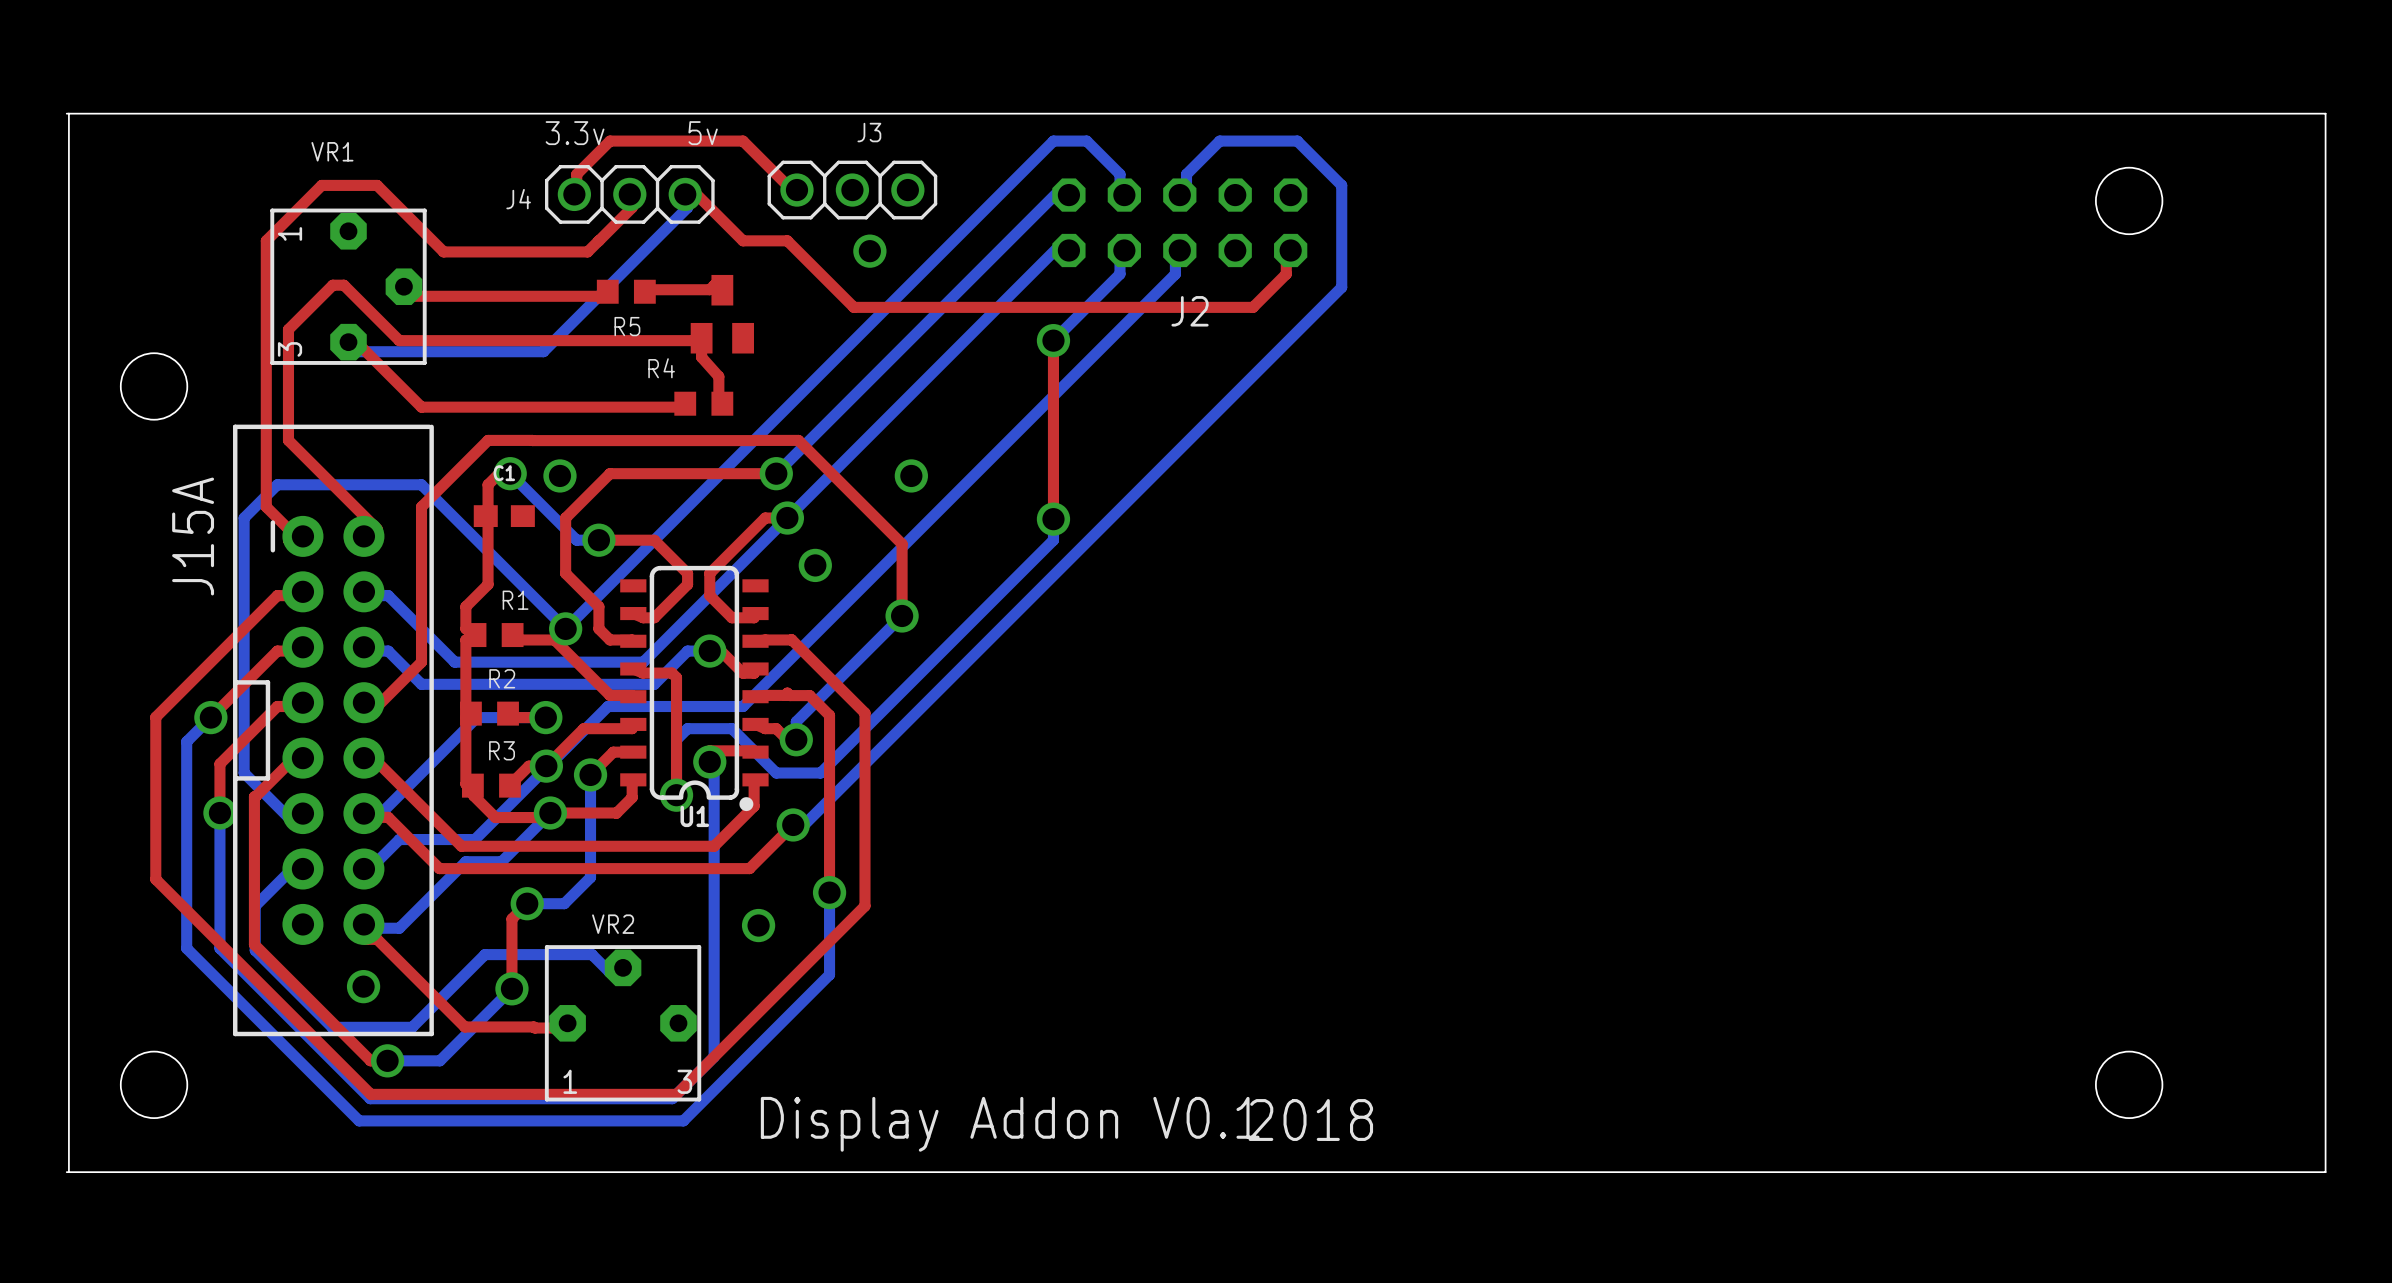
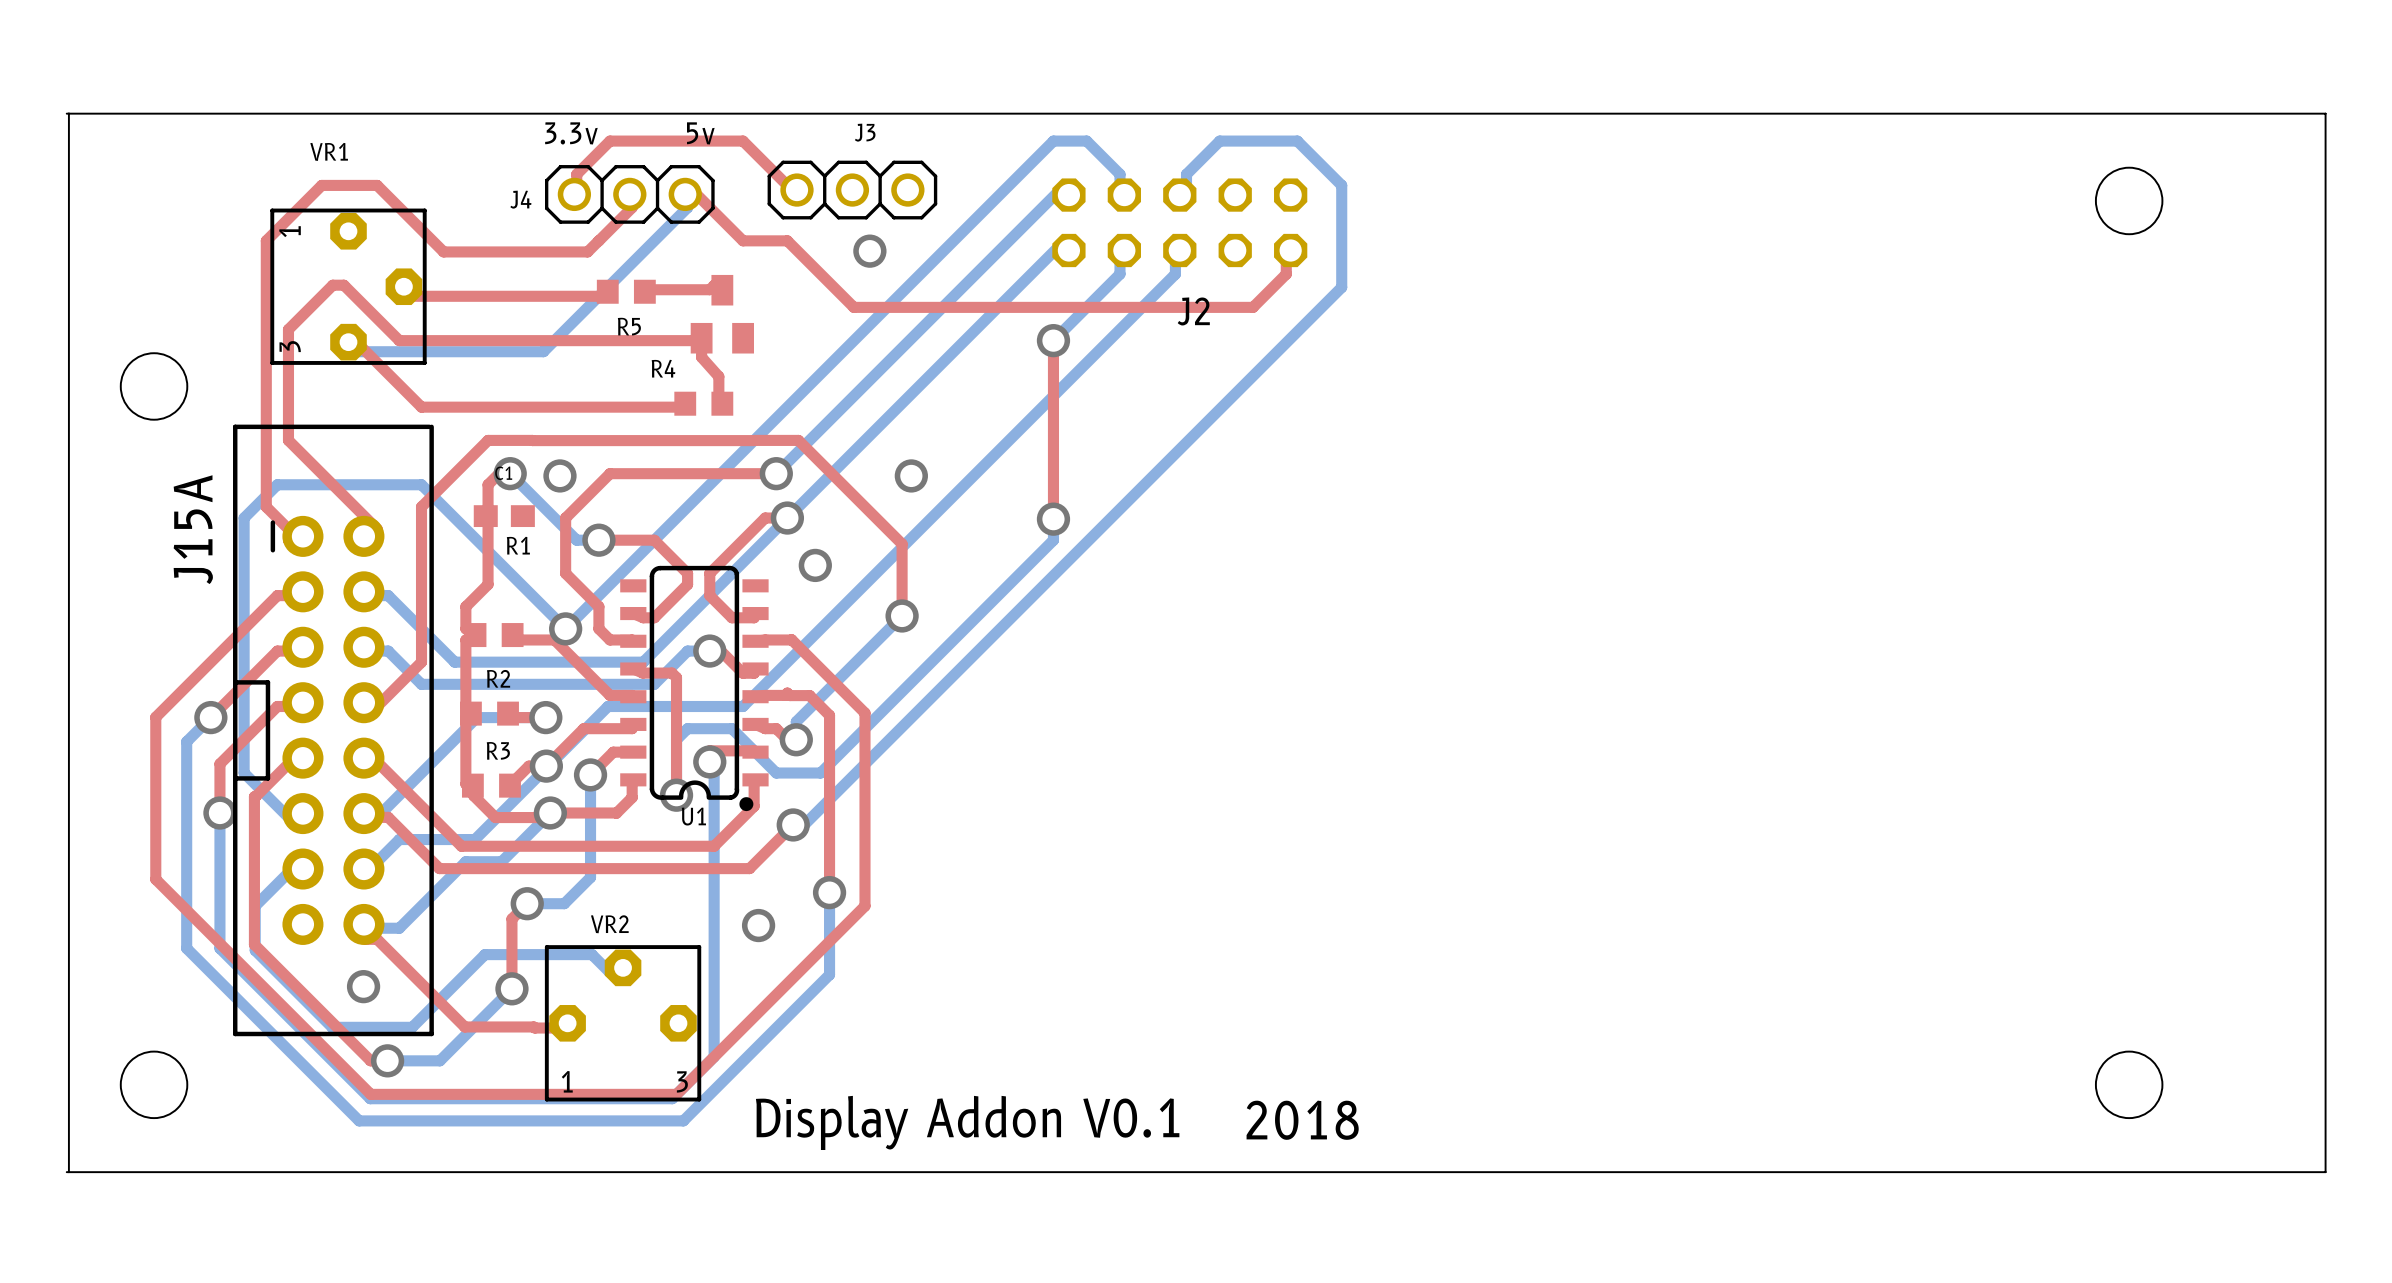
R1 name position: R1 (515, 600) -> R1 (518, 545)

